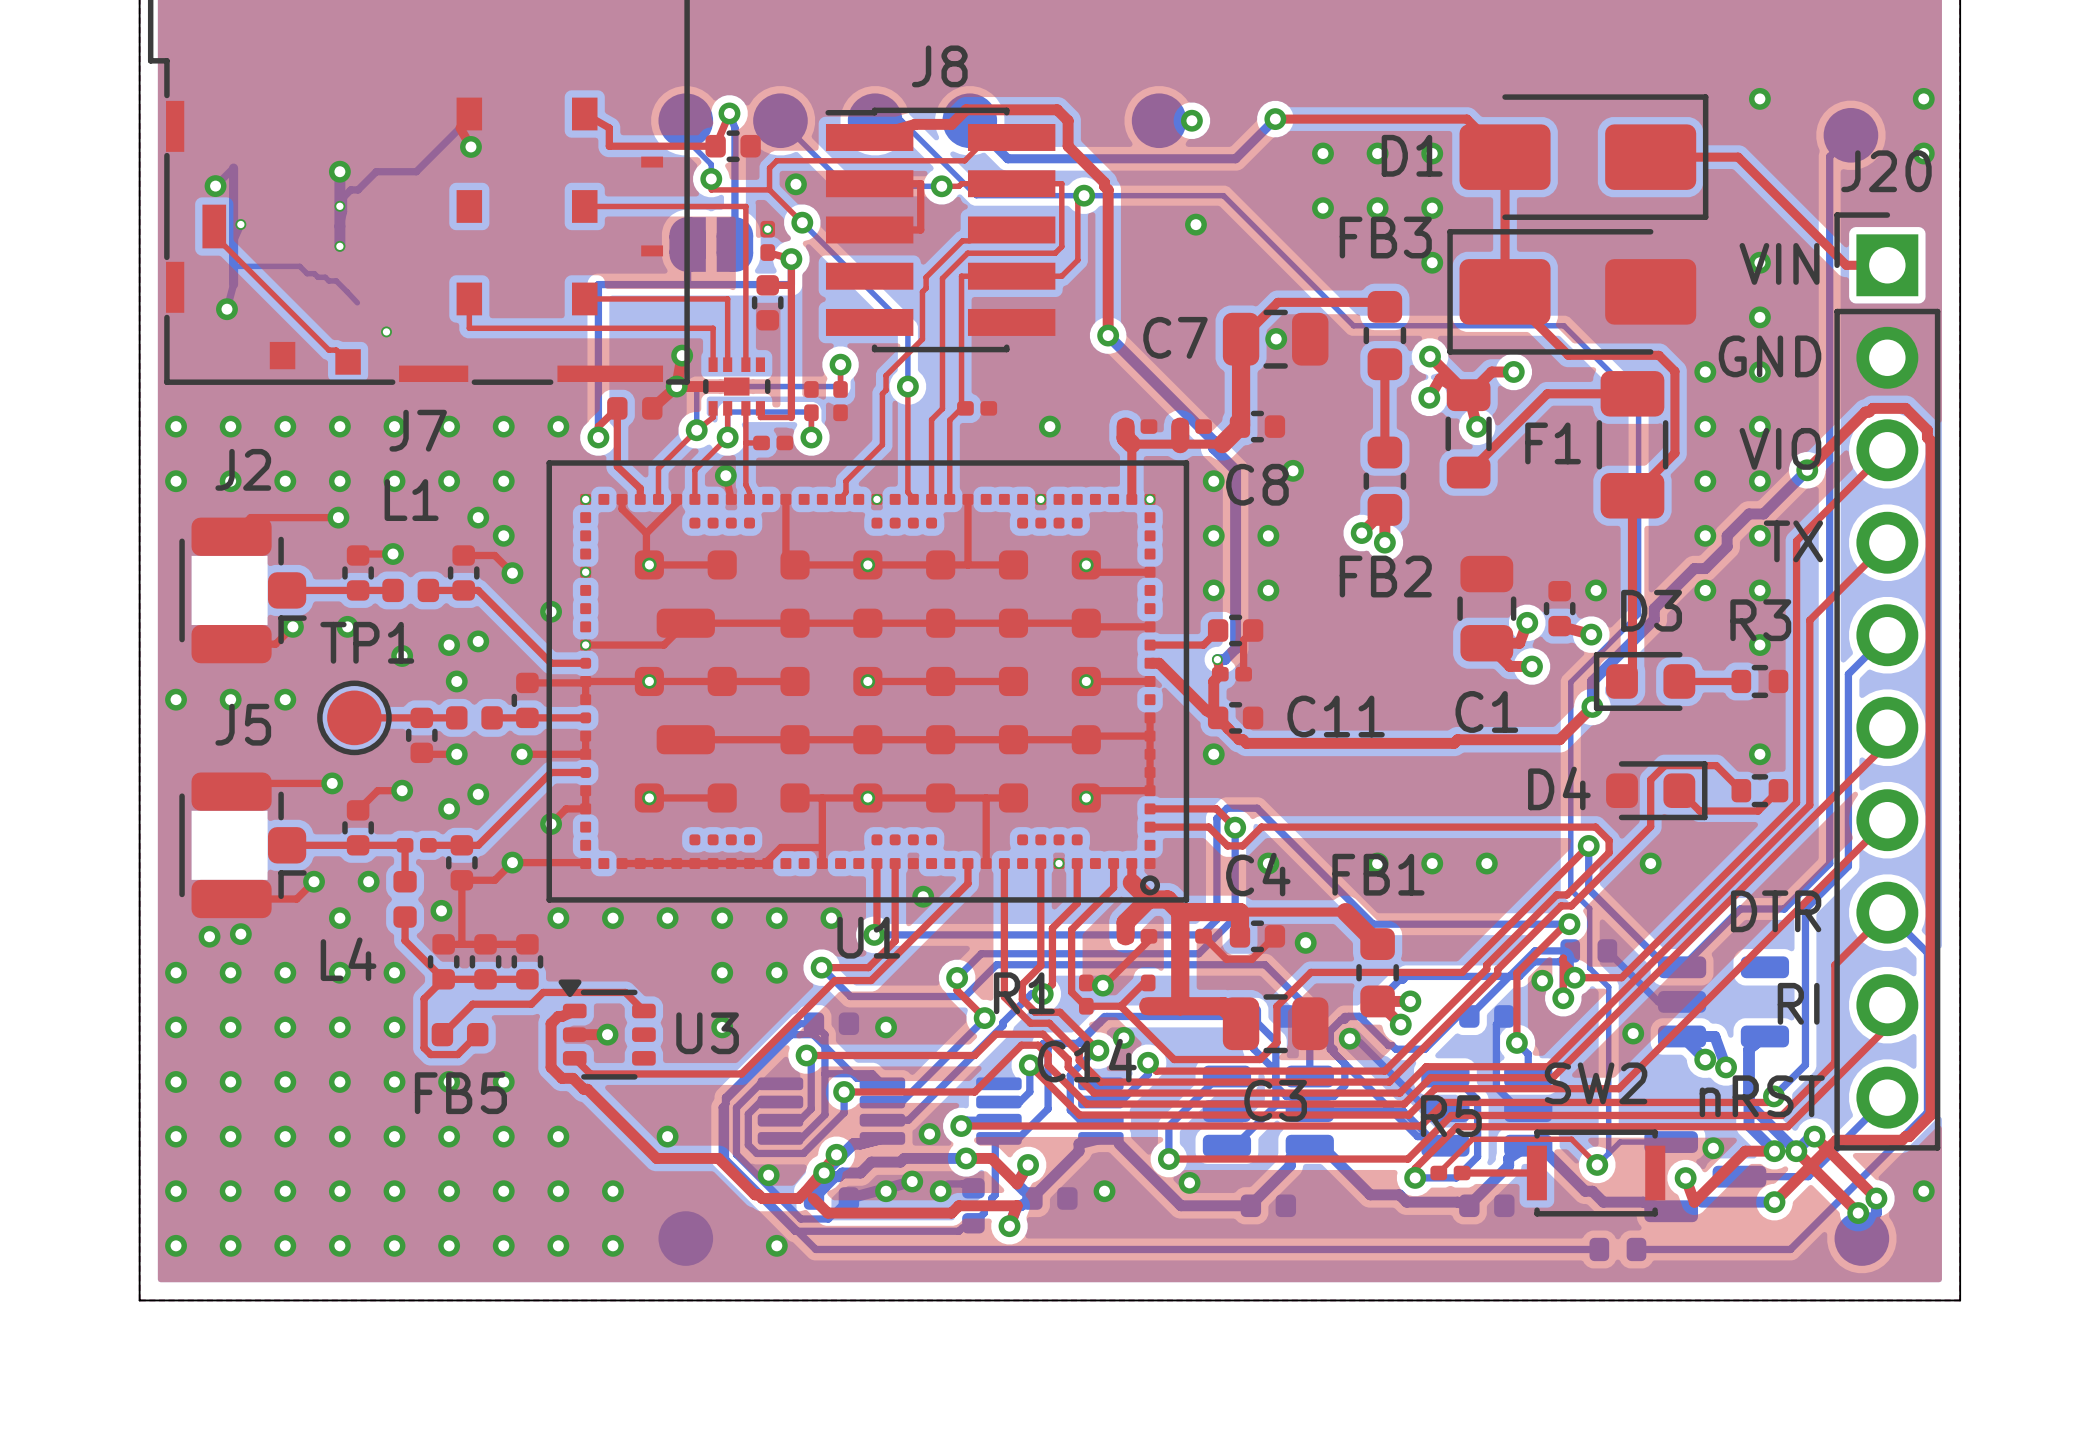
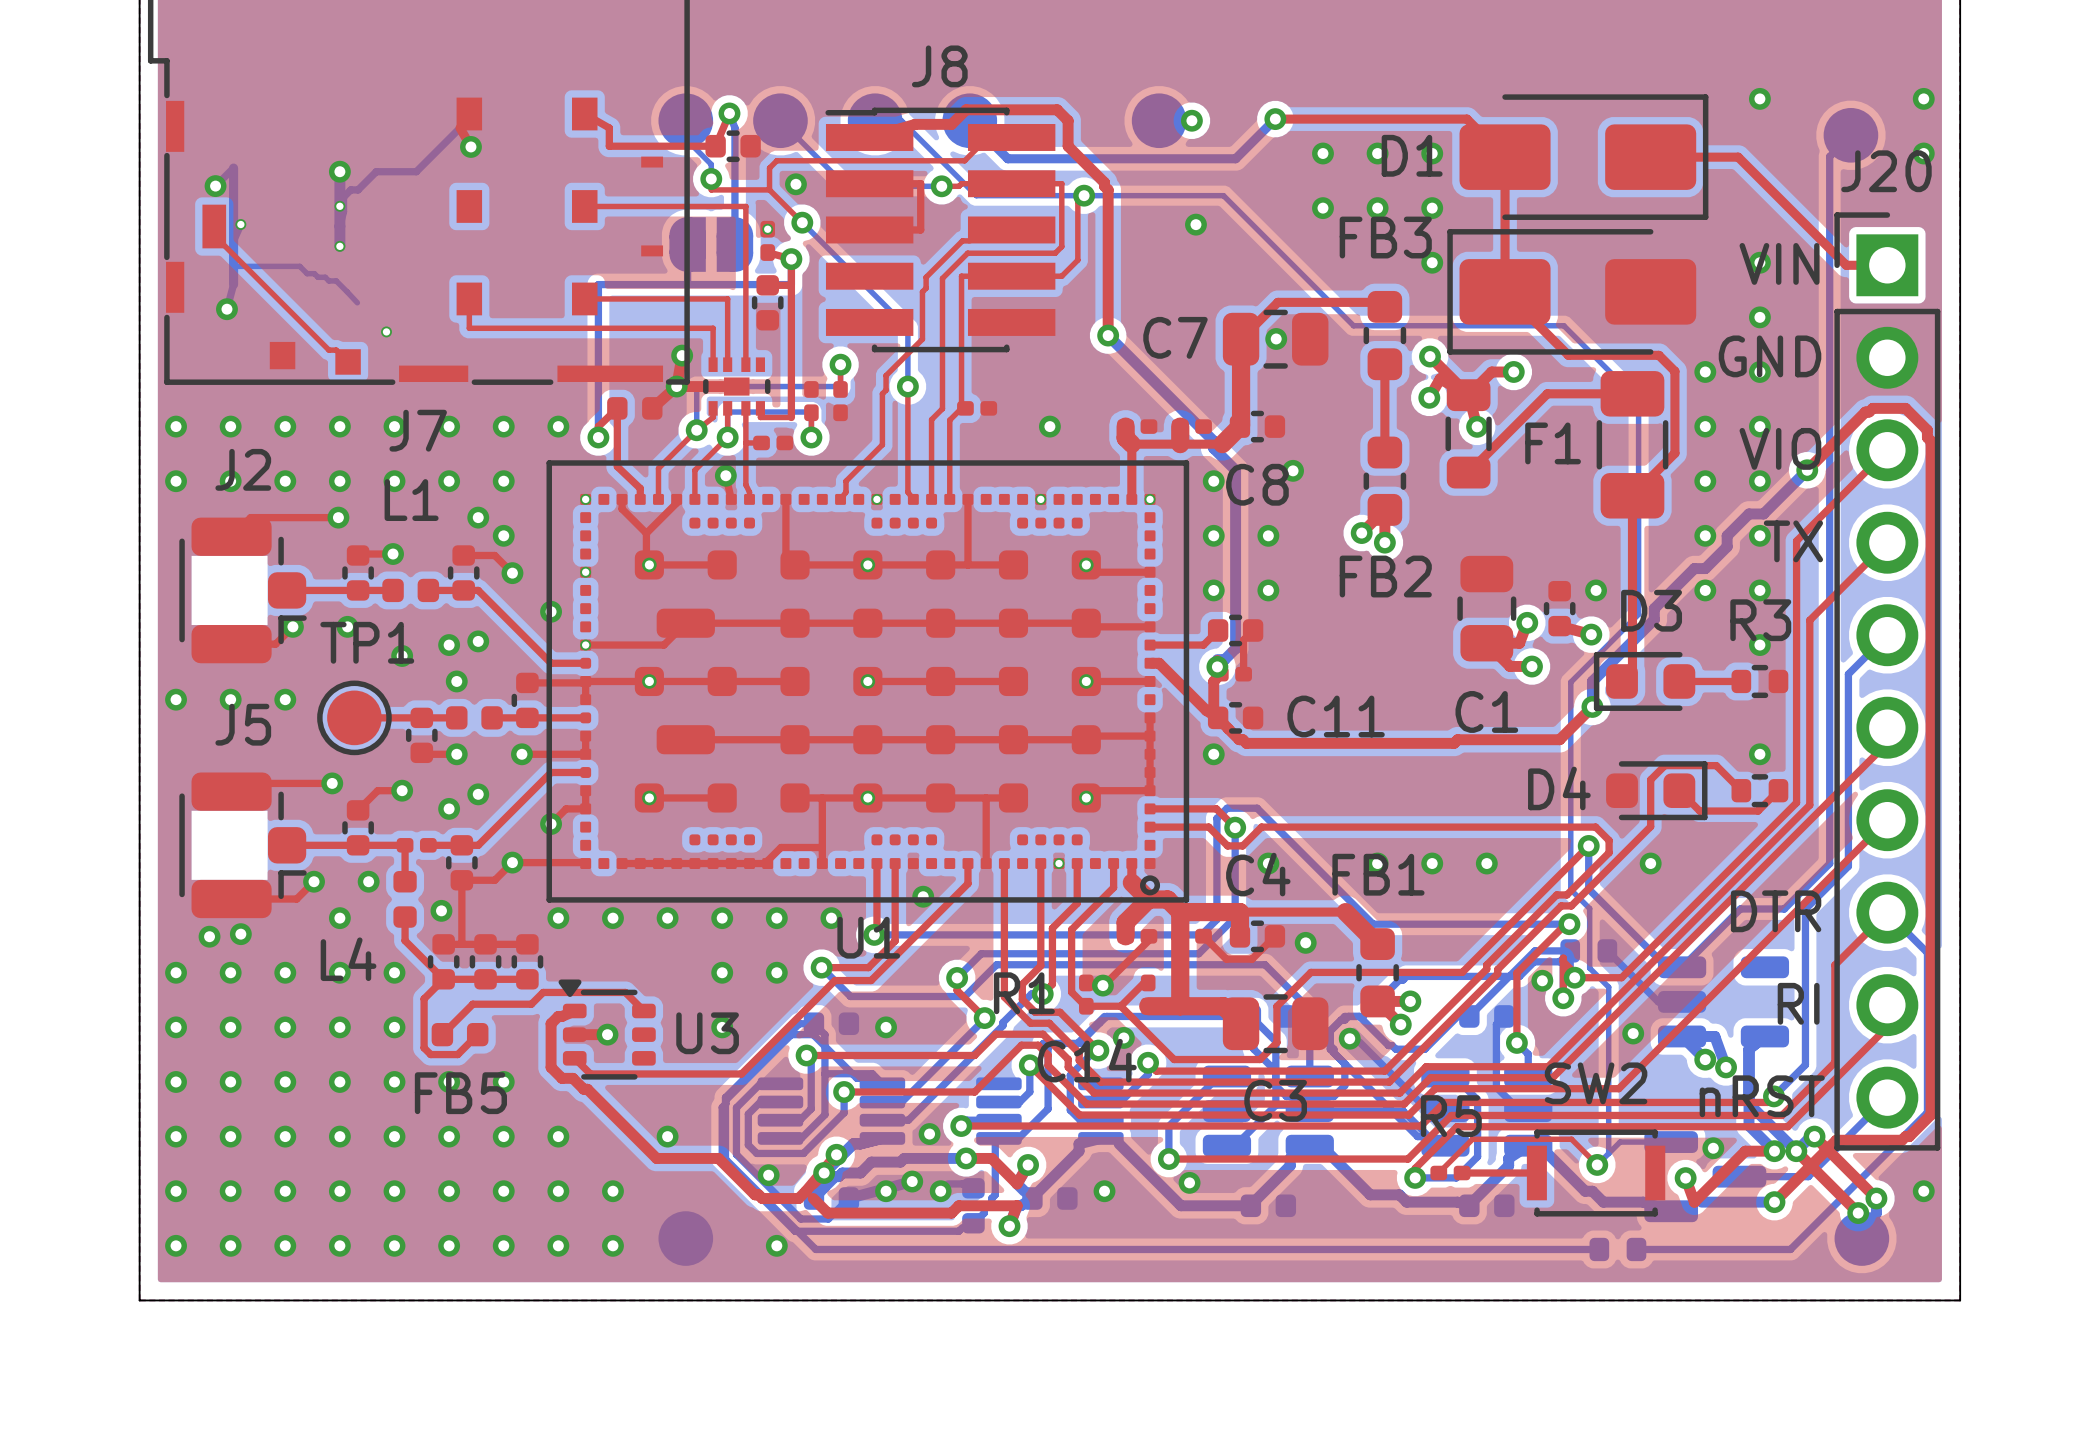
via size: [1211, 654, 1223, 666] -> [1206, 655, 1229, 678]

